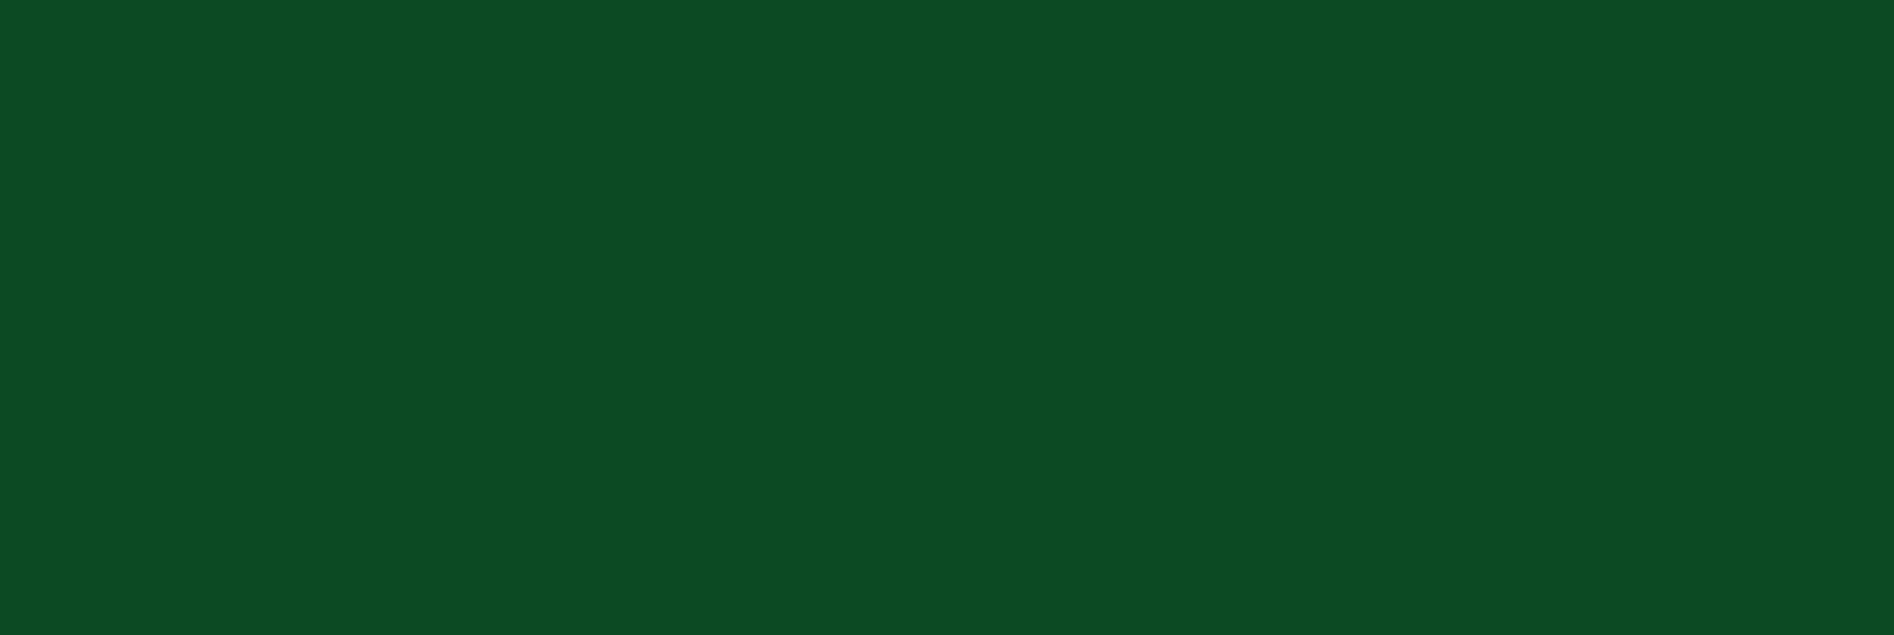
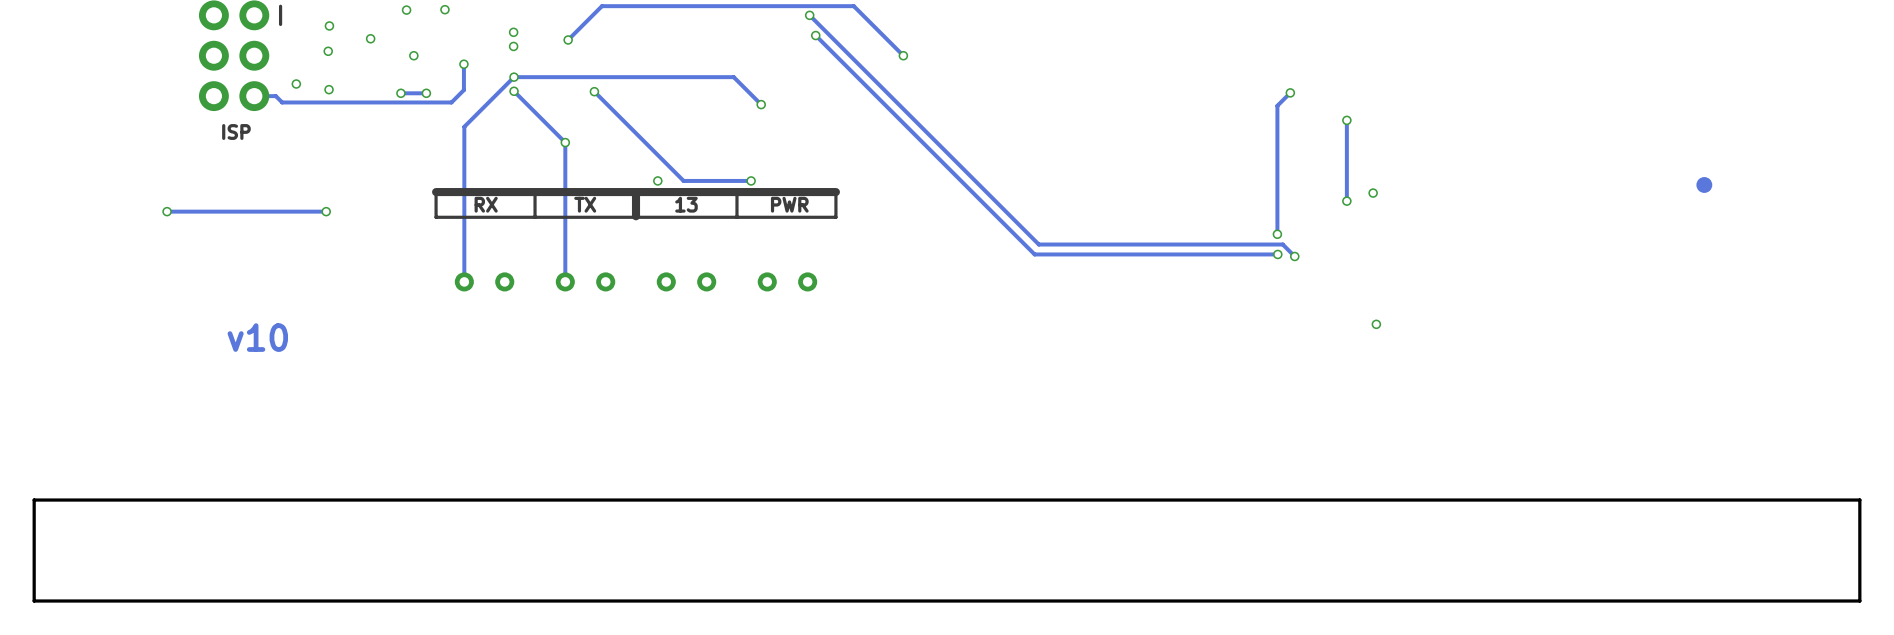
line: none -> (280, 6) (280, 24)
via: none -> (444, 9)
via: none -> (406, 10)
track: none -> (809, 15) (1038, 244) (1282, 244) (1294, 256)
via: none -> (809, 15)
via: none -> (329, 25)
via: none -> (513, 32)
track: none -> (815, 35) (1034, 254) (1277, 254)
via: none -> (815, 35)
via: none -> (370, 38)
track: none -> (568, 39) (601, 6) (853, 6) (903, 55)
via: none -> (568, 39)
via: none -> (513, 46)
via: none -> (328, 51)
part: none -> (234, 55)
via: none -> (413, 55)
via: none -> (903, 55)
track: none -> (463, 64) (463, 90) (451, 102) (282, 102) (275, 96) (254, 96)
via: none -> (463, 64)
via: none -> (514, 77)
via: none -> (296, 84)
via: none -> (329, 89)
track: none -> (514, 91) (565, 142) (565, 281)
via: none -> (514, 91)
track: none -> (594, 91) (683, 180) (751, 180)
via: none -> (594, 91)
track: none -> (1290, 92) (1277, 105) (1277, 234)
via: none -> (1290, 92)
via: none -> (400, 93)
track: none -> (426, 93) (400, 93)
via: none -> (426, 93)
track: none -> (761, 104) (733, 77) (514, 77) (464, 126) (464, 281)
via: none -> (761, 104)
track: none -> (1346, 120) (1346, 201)
via: none -> (1346, 120)
text: none -> ISP (236, 132)
via: none -> (565, 142)
via: none -> (657, 180)
via: none -> (751, 180)
part: none -> (1704, 184)
line: none -> (436, 192) (835, 192) (436, 192)
line: none -> (436, 192) (436, 217) (835, 217) (835, 193)
line: none -> (535, 192) (535, 217)
line: none -> (736, 192) (736, 217)
line: none -> (636, 193) (636, 216) (636, 193)
via: none -> (1373, 193)
via: none -> (1346, 201)
text: none -> RX (486, 204)
text: none -> TX (585, 204)
text: none -> 13 (686, 204)
text: none -> PWR (789, 204)
via: none -> (167, 211)
track: none -> (326, 211) (167, 211)
via: none -> (326, 211)
via: none -> (1277, 234)
via: none -> (1277, 254)
via: none -> (1294, 256)
part: none -> (484, 281)
part: none -> (585, 281)
part: none -> (686, 281)
part: none -> (787, 281)
via: none -> (1376, 324)
text: none -> v10 (257, 337)
board edge: none -> (1859, 500) (1859, 601) (34, 601) (34, 500) (1859, 500)

